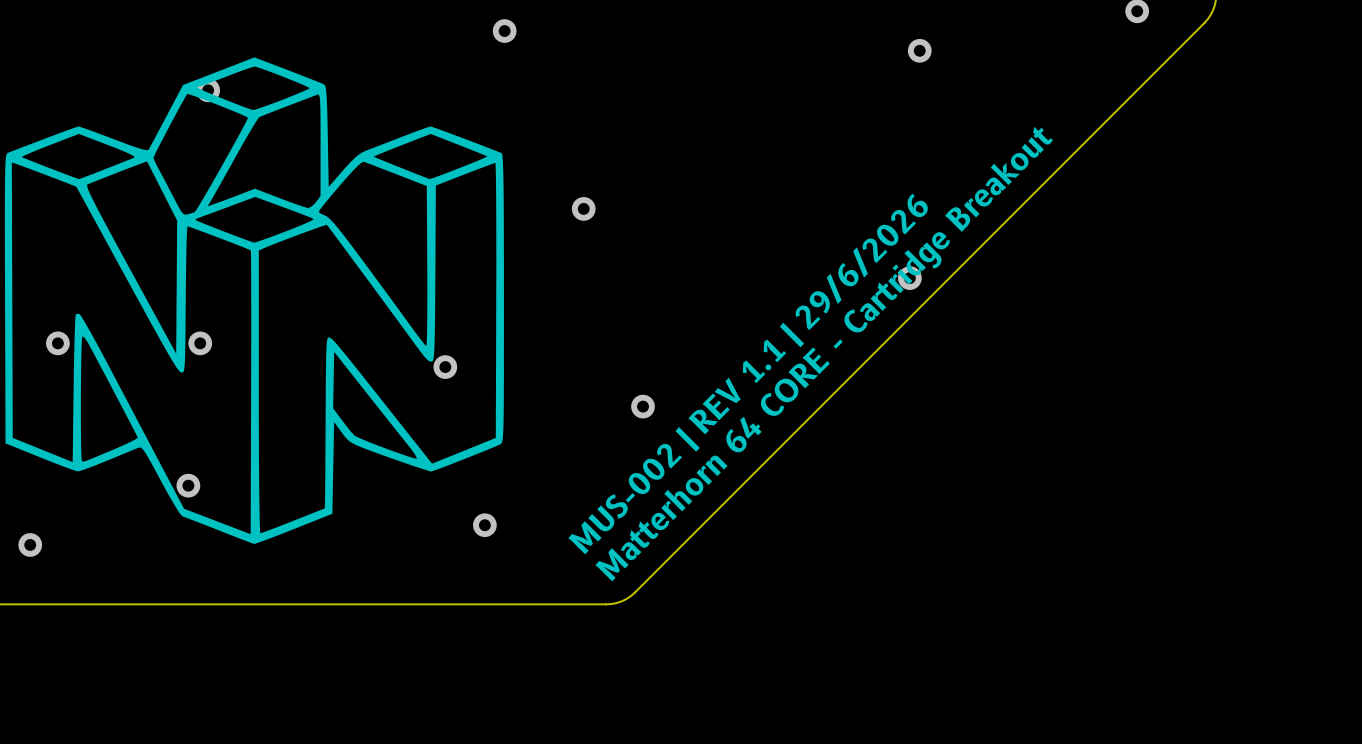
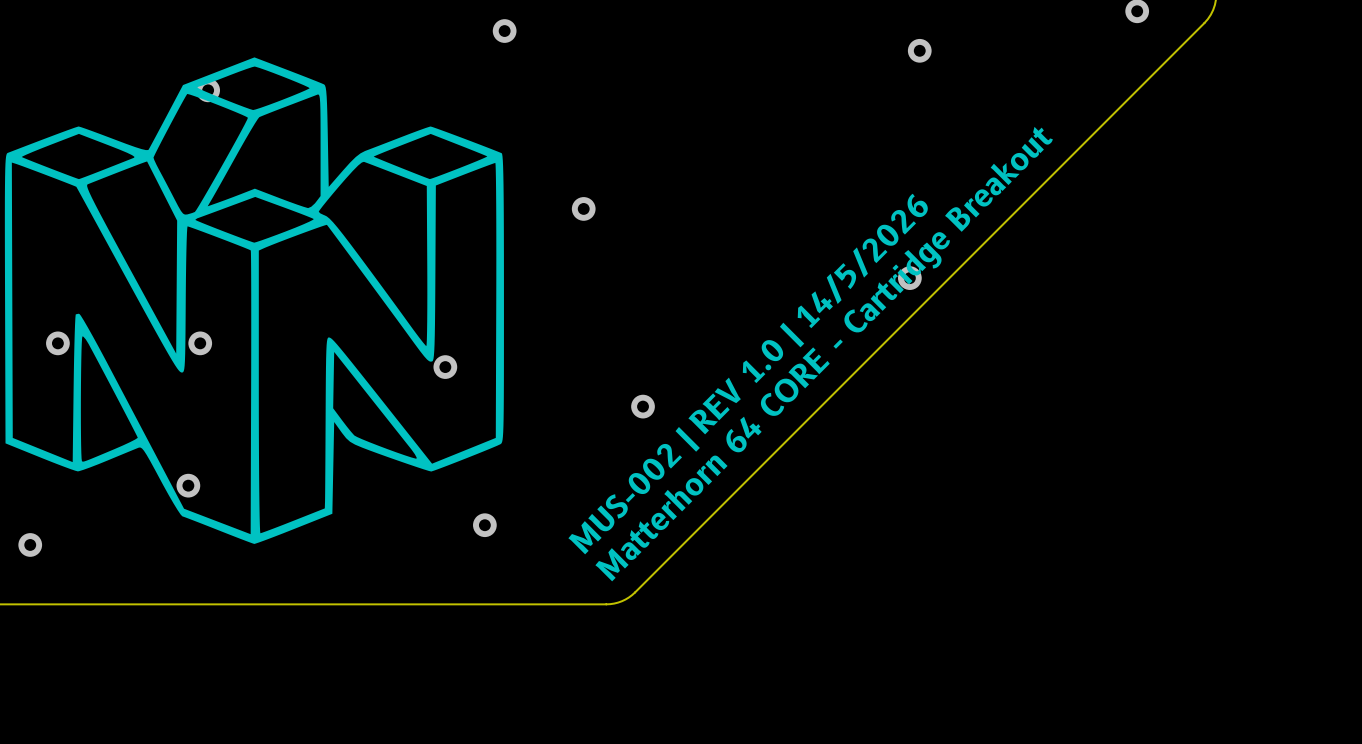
text: MUS-002 | REV 1.1 | 29/6/2026 (748, 374) -> MUS-002 | REV 1.0 | 14/5/2026 (748, 374)

